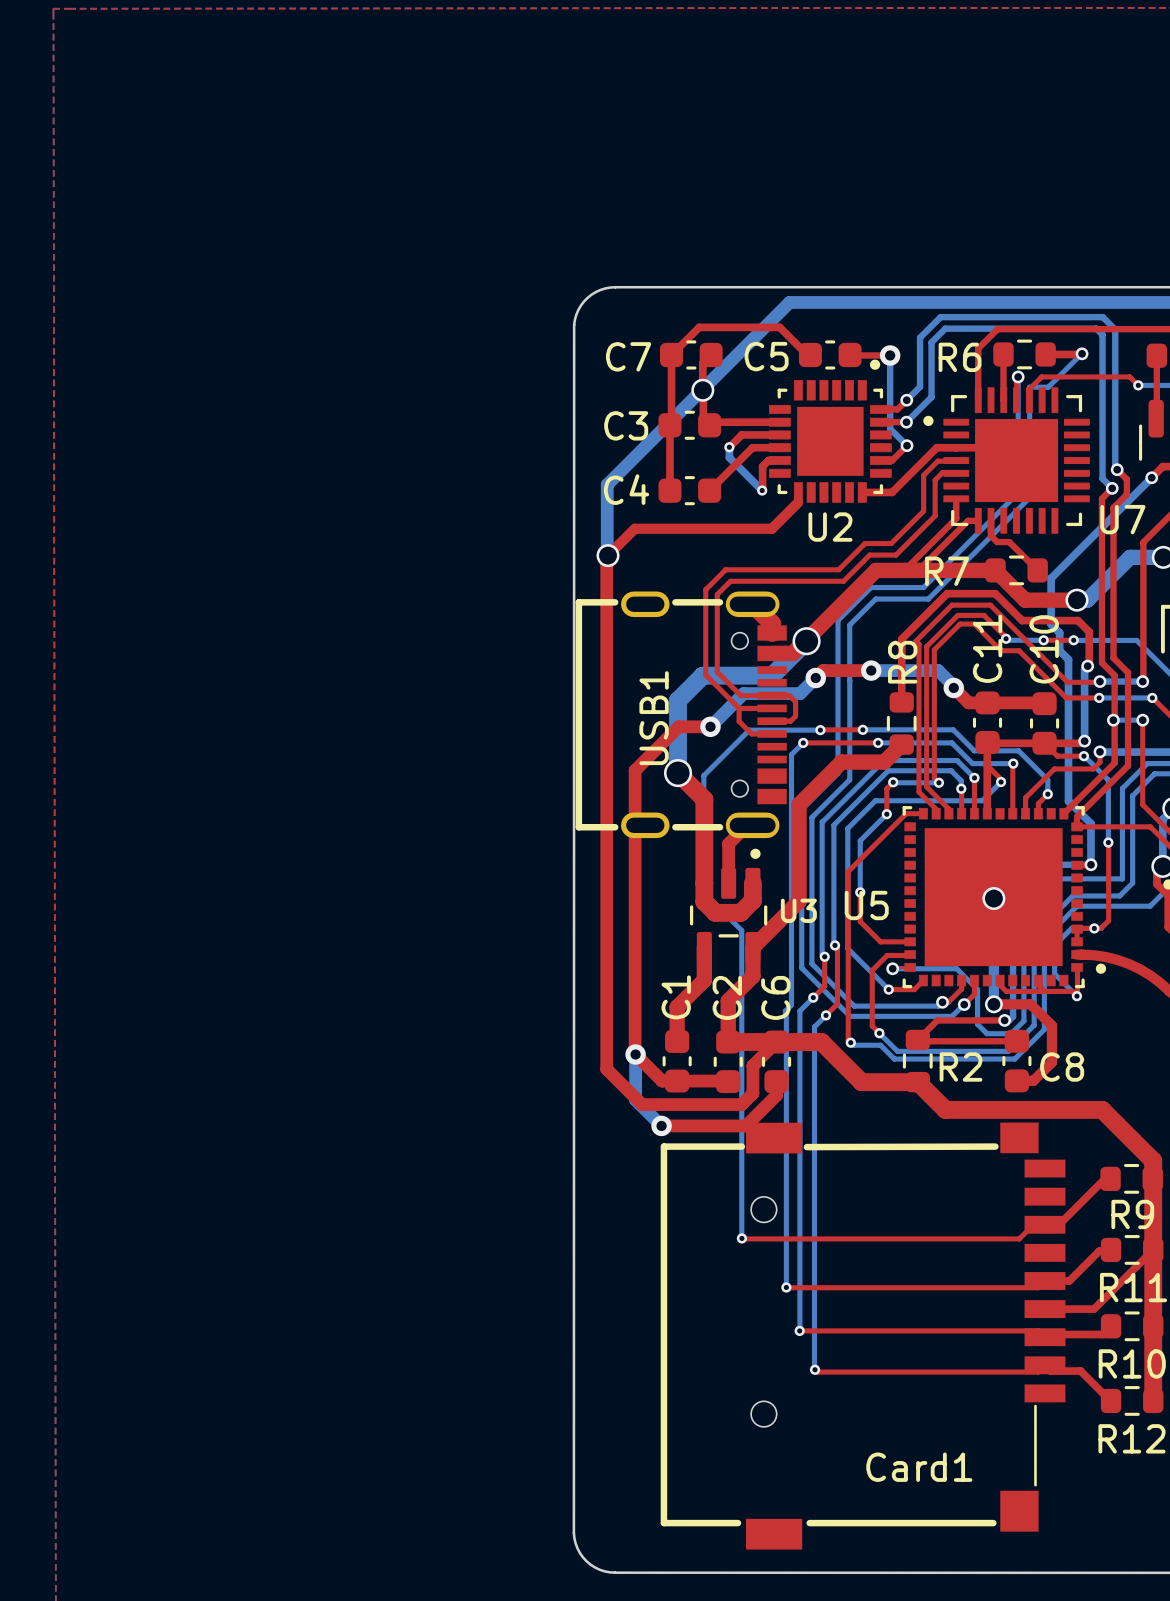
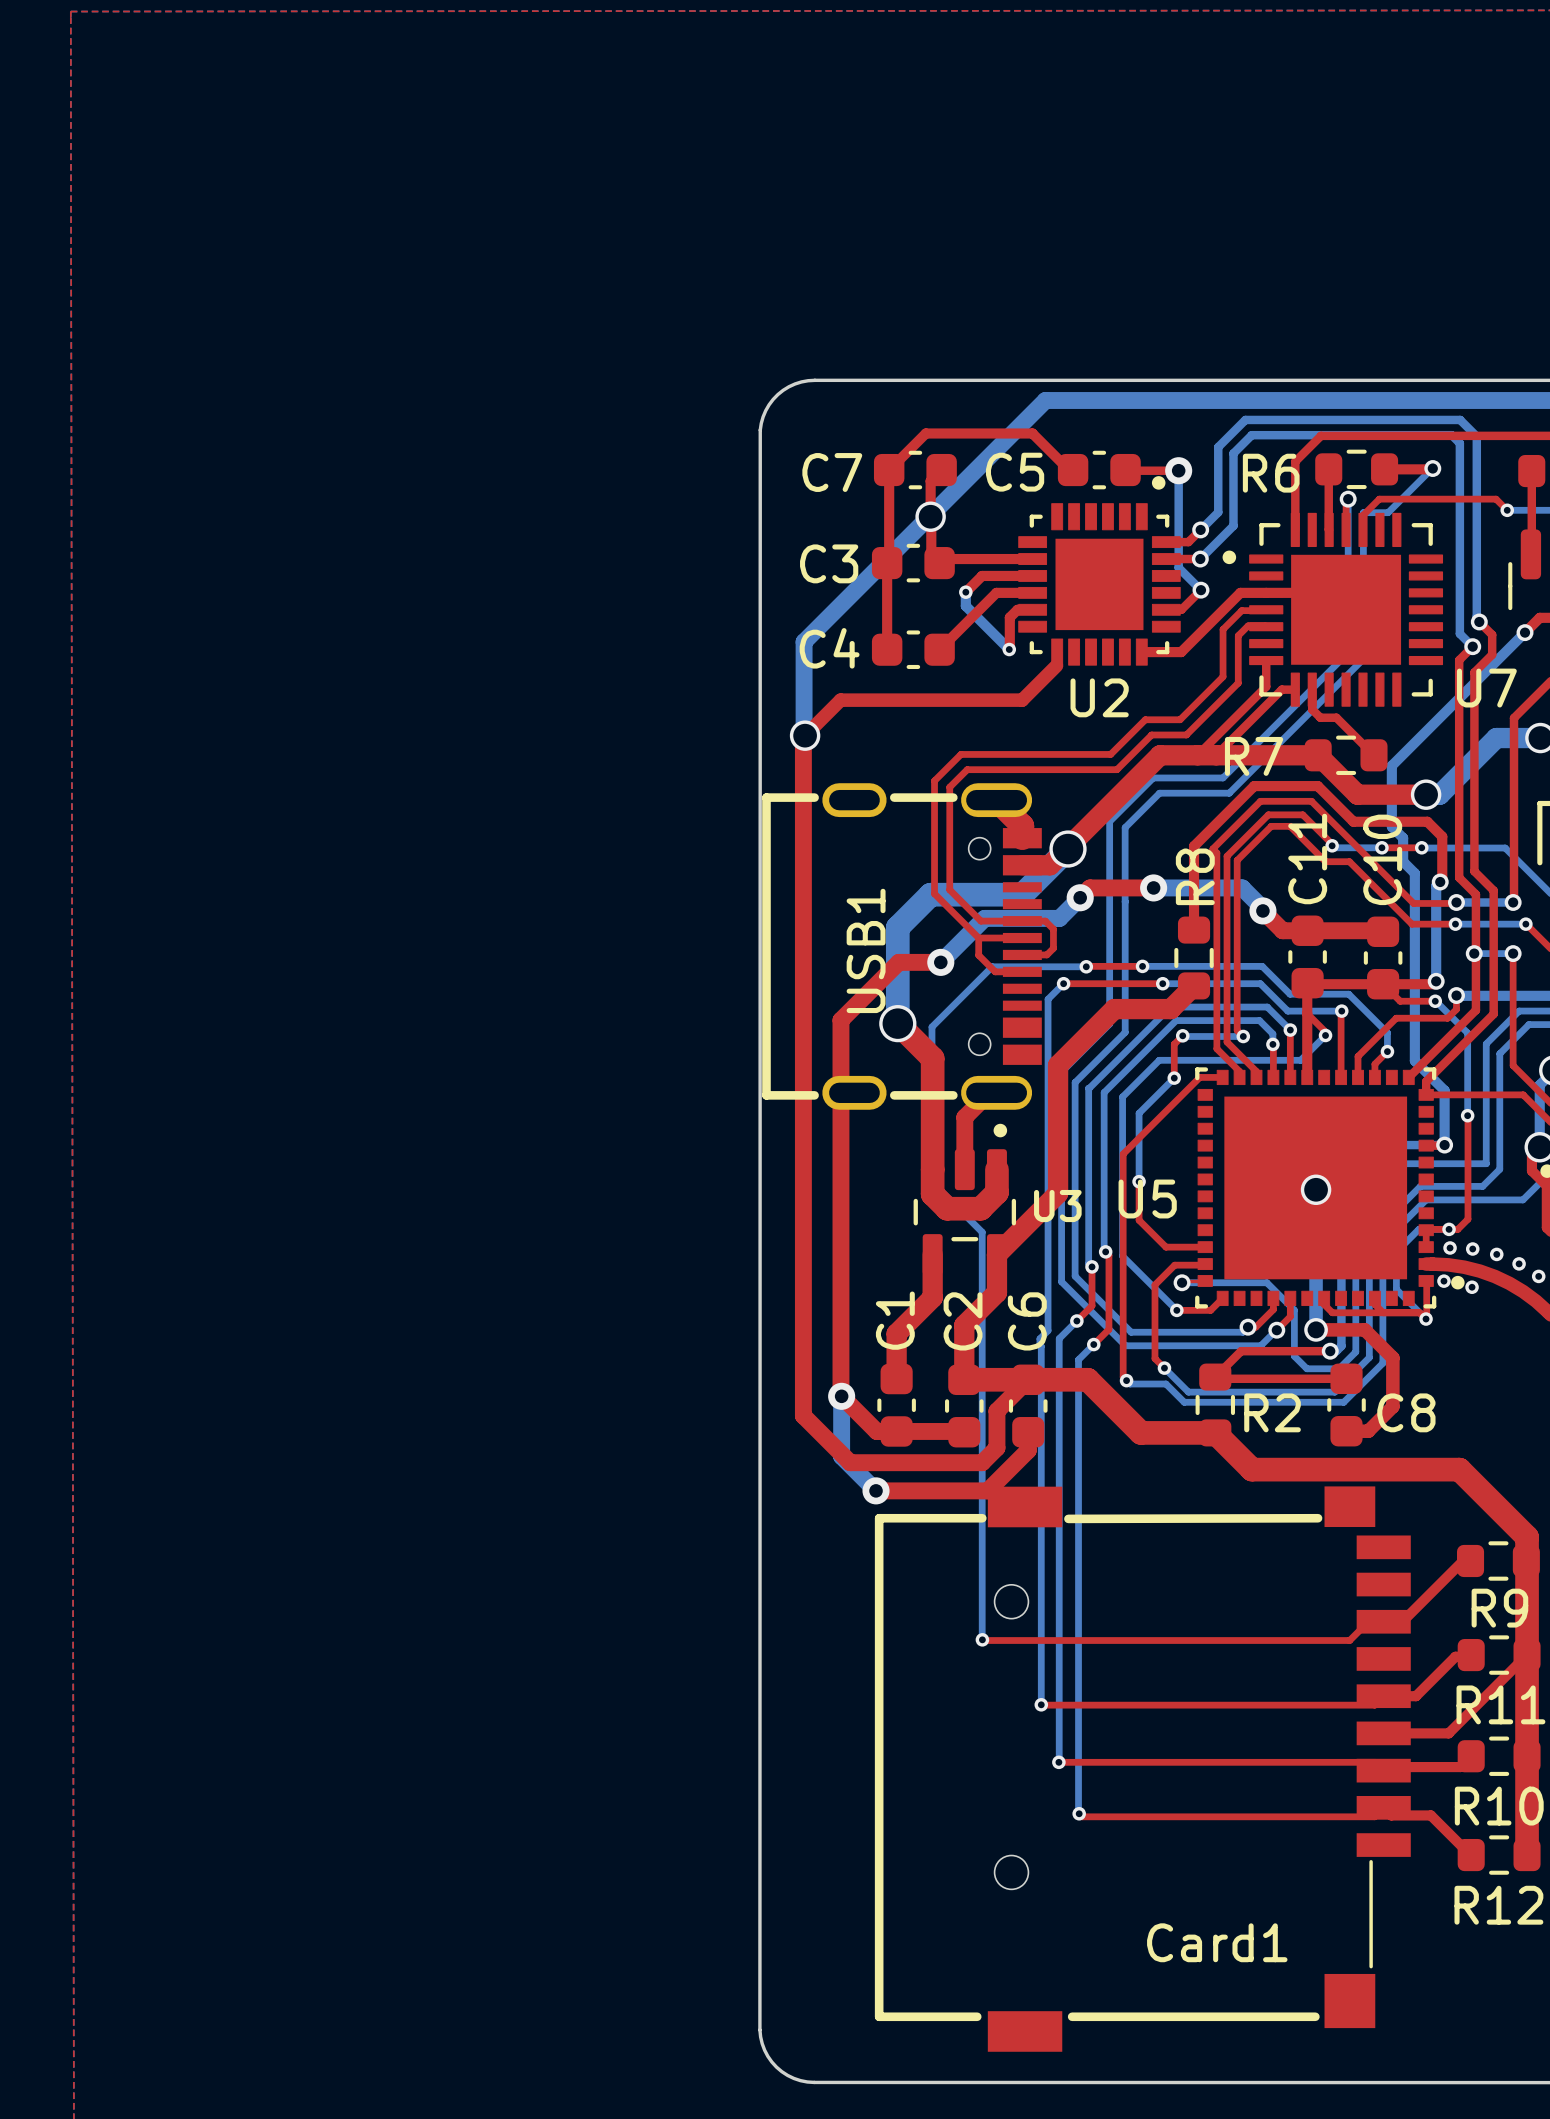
via: none -> (1450, 1247)
via: none -> (1472, 1249)
via: none -> (1496, 1254)
via: none -> (1519, 1263)
via: none -> (1538, 1276)
via: none -> (1443, 1281)
via: none -> (1472, 1287)

